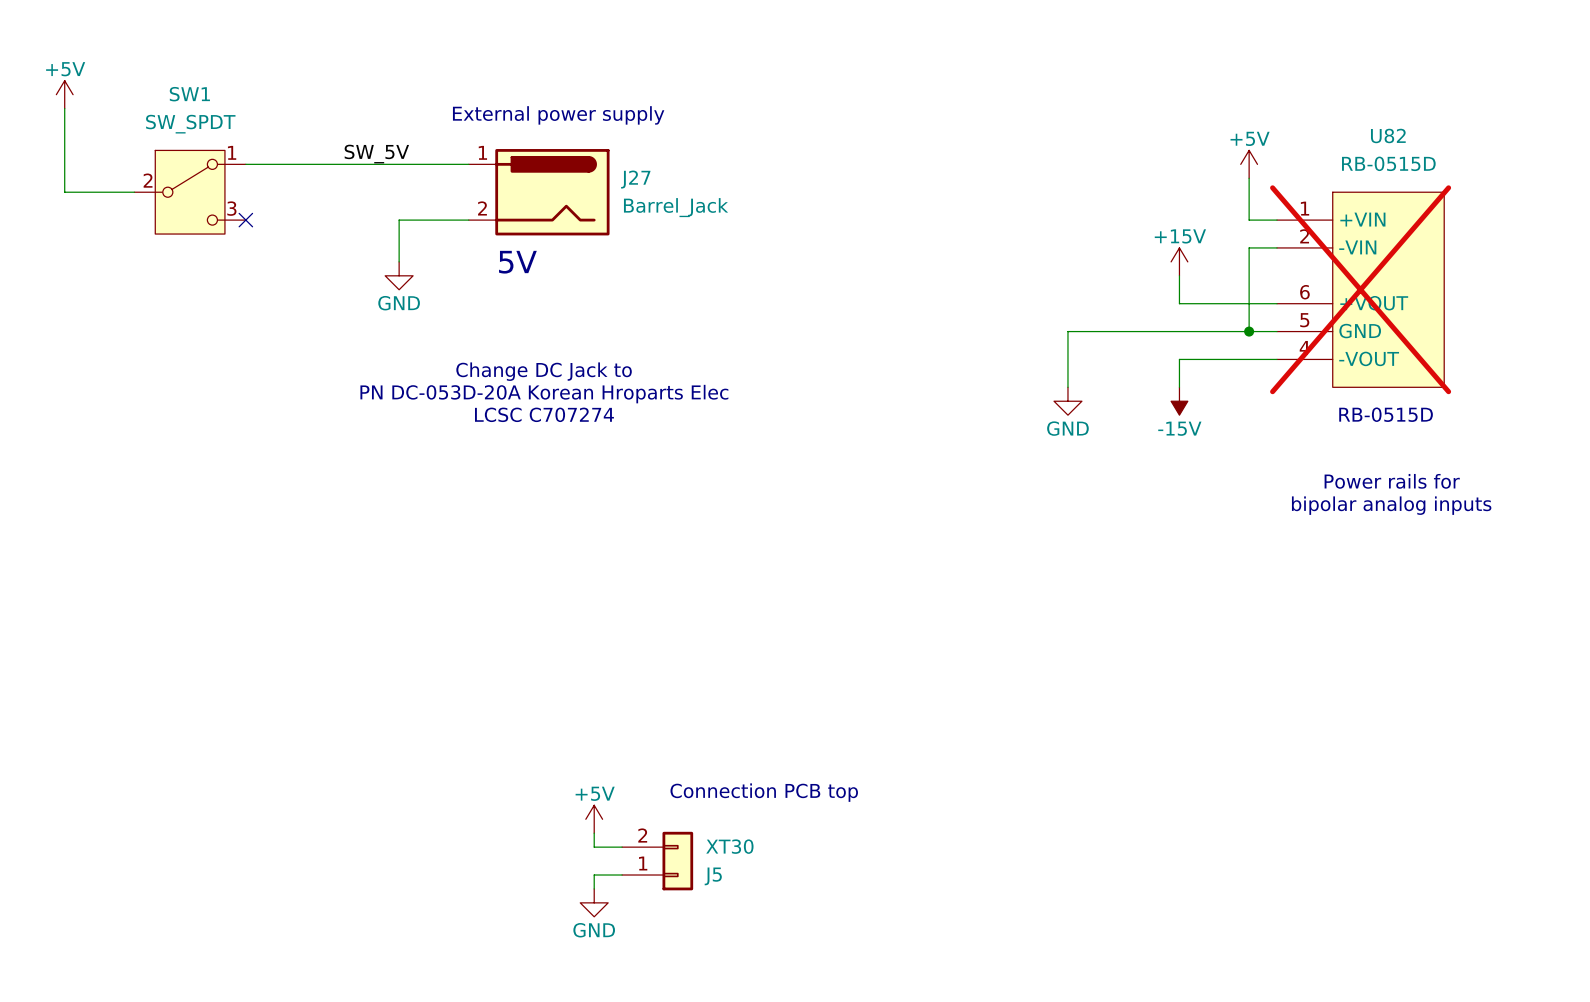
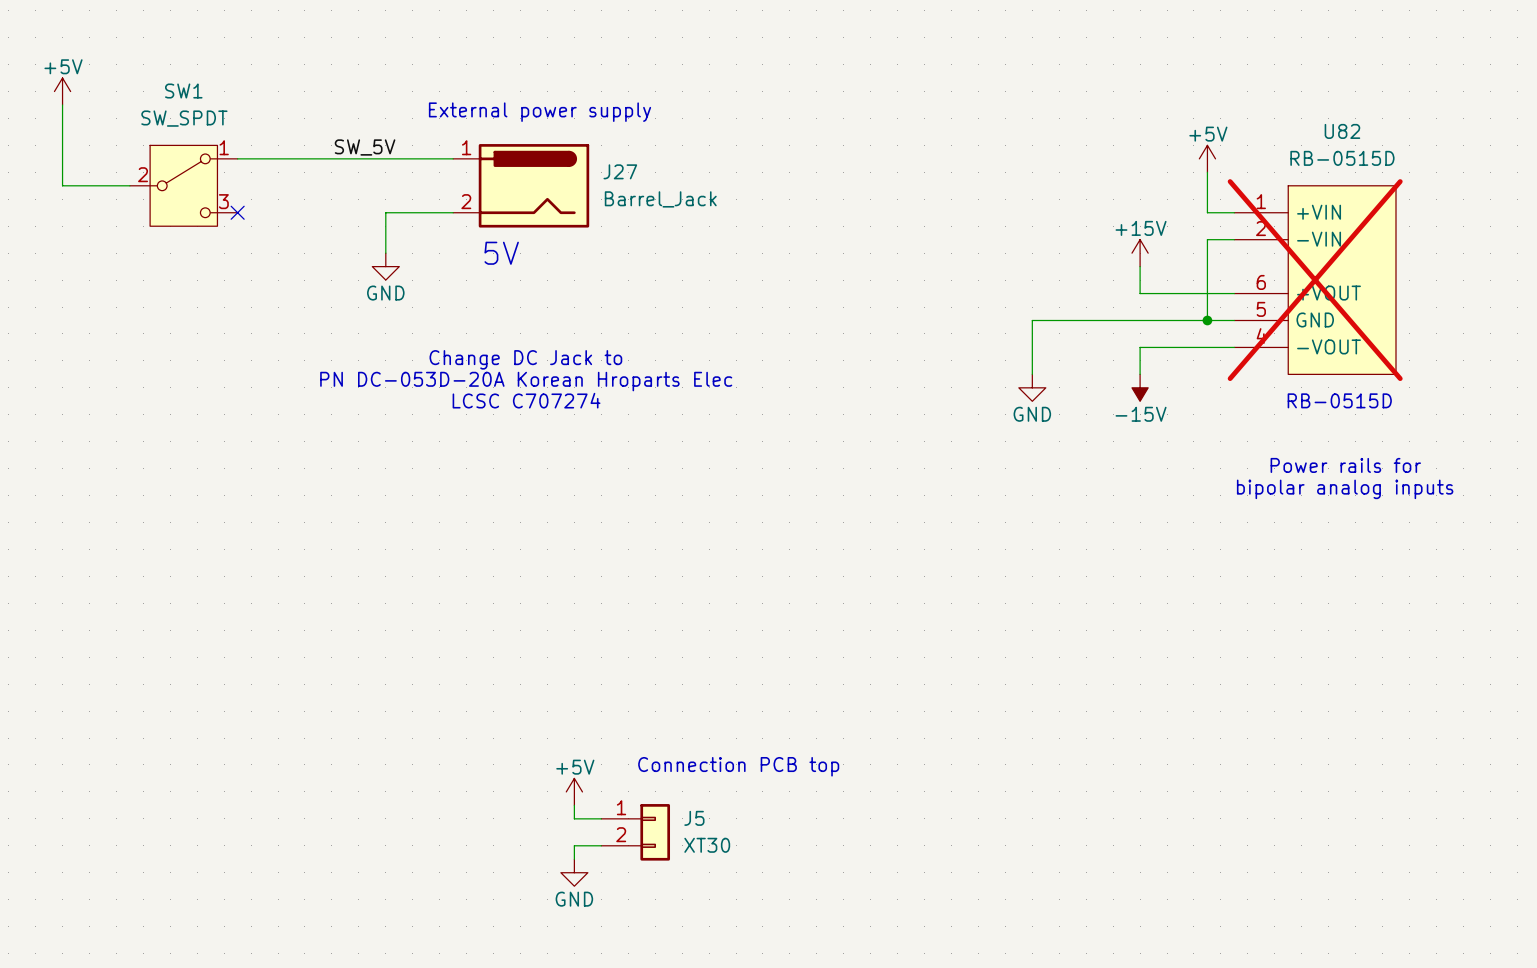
J5 flip: as is (677, 861) -> up-down (655, 832)

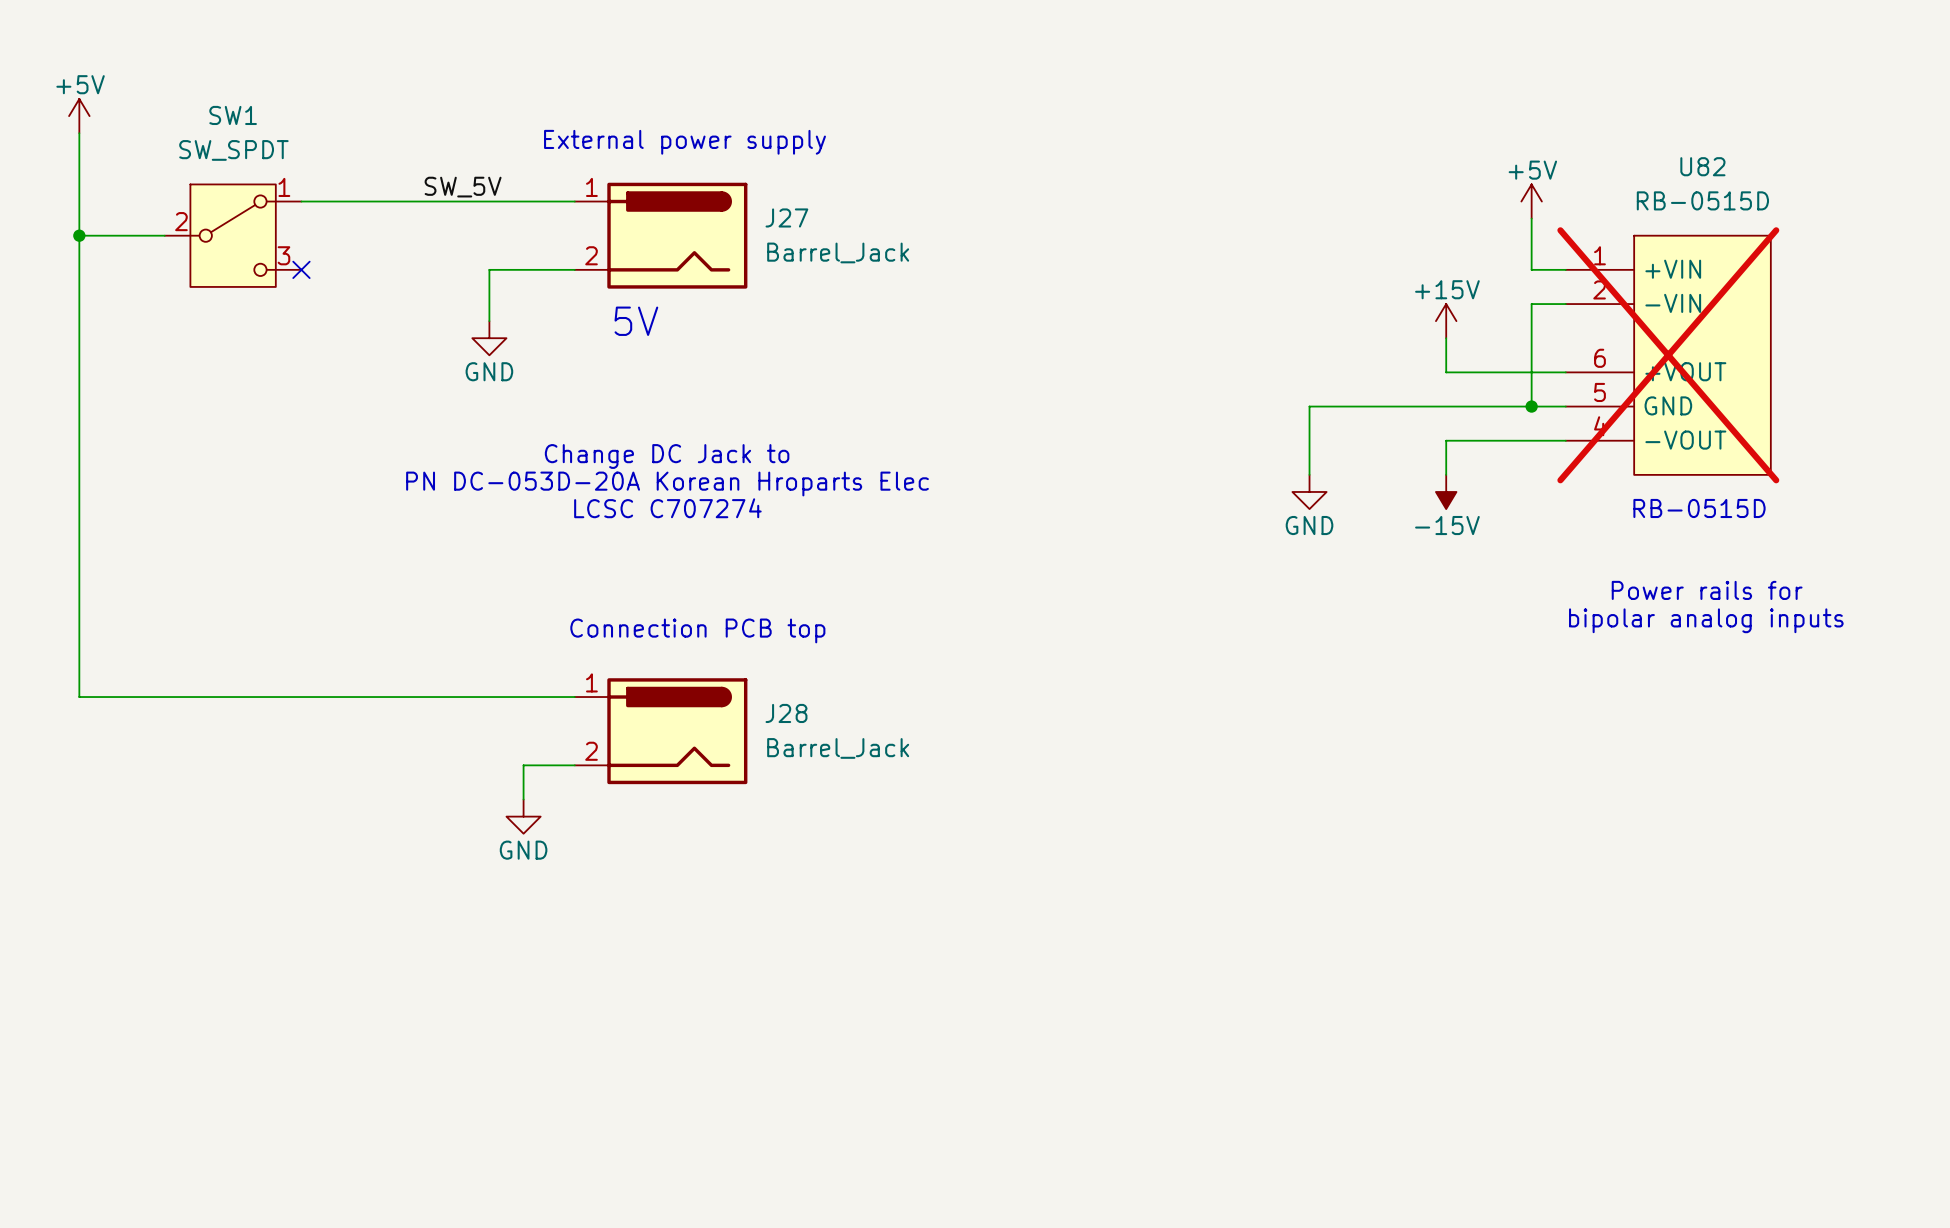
wire: none -> (79, 235) (79, 697) (574, 697)
junction: none -> (79, 235)
text: none -> Connection PCB top (697, 630)
J28: none -> Barrel_Jack (661, 731)
wire: none -> (574, 765) (523, 765) (523, 799)
power symbol: none -> GND (523, 816)
text: Connection PCB top (738, 766) -> none
power symbol: +5V (574, 791) -> none
wire: (574, 805) (574, 818) (601, 818) -> none
J5: XT30 (635, 832) -> none
wire: (601, 845) (574, 845) (574, 859) -> none
power symbol: GND (574, 872) -> none

